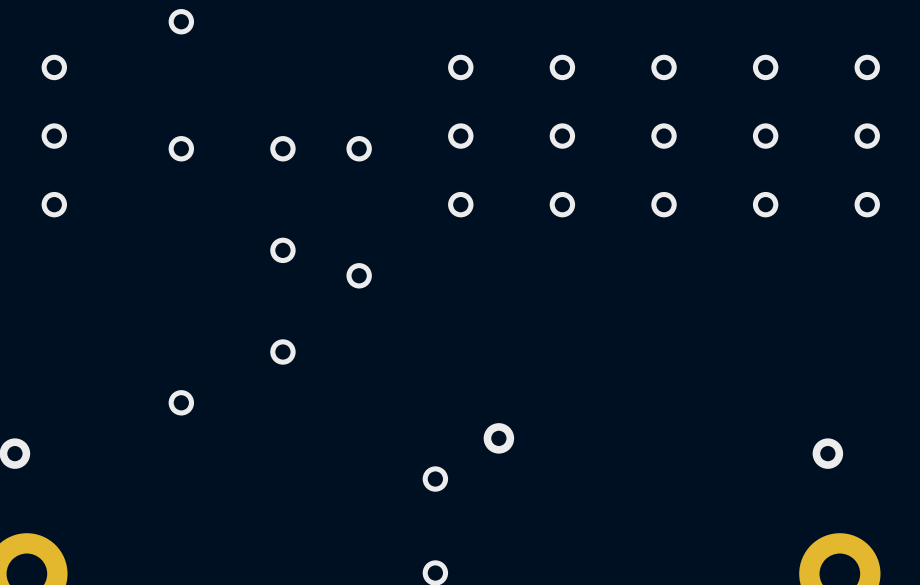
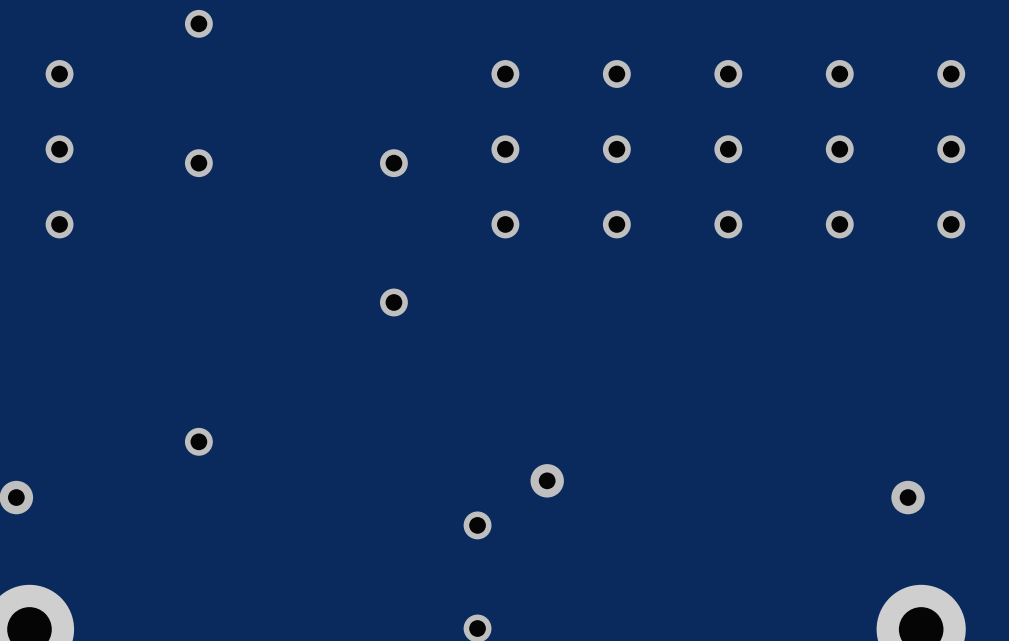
via: (282, 148) -> none
via: (282, 250) -> none
via: (282, 351) -> none

